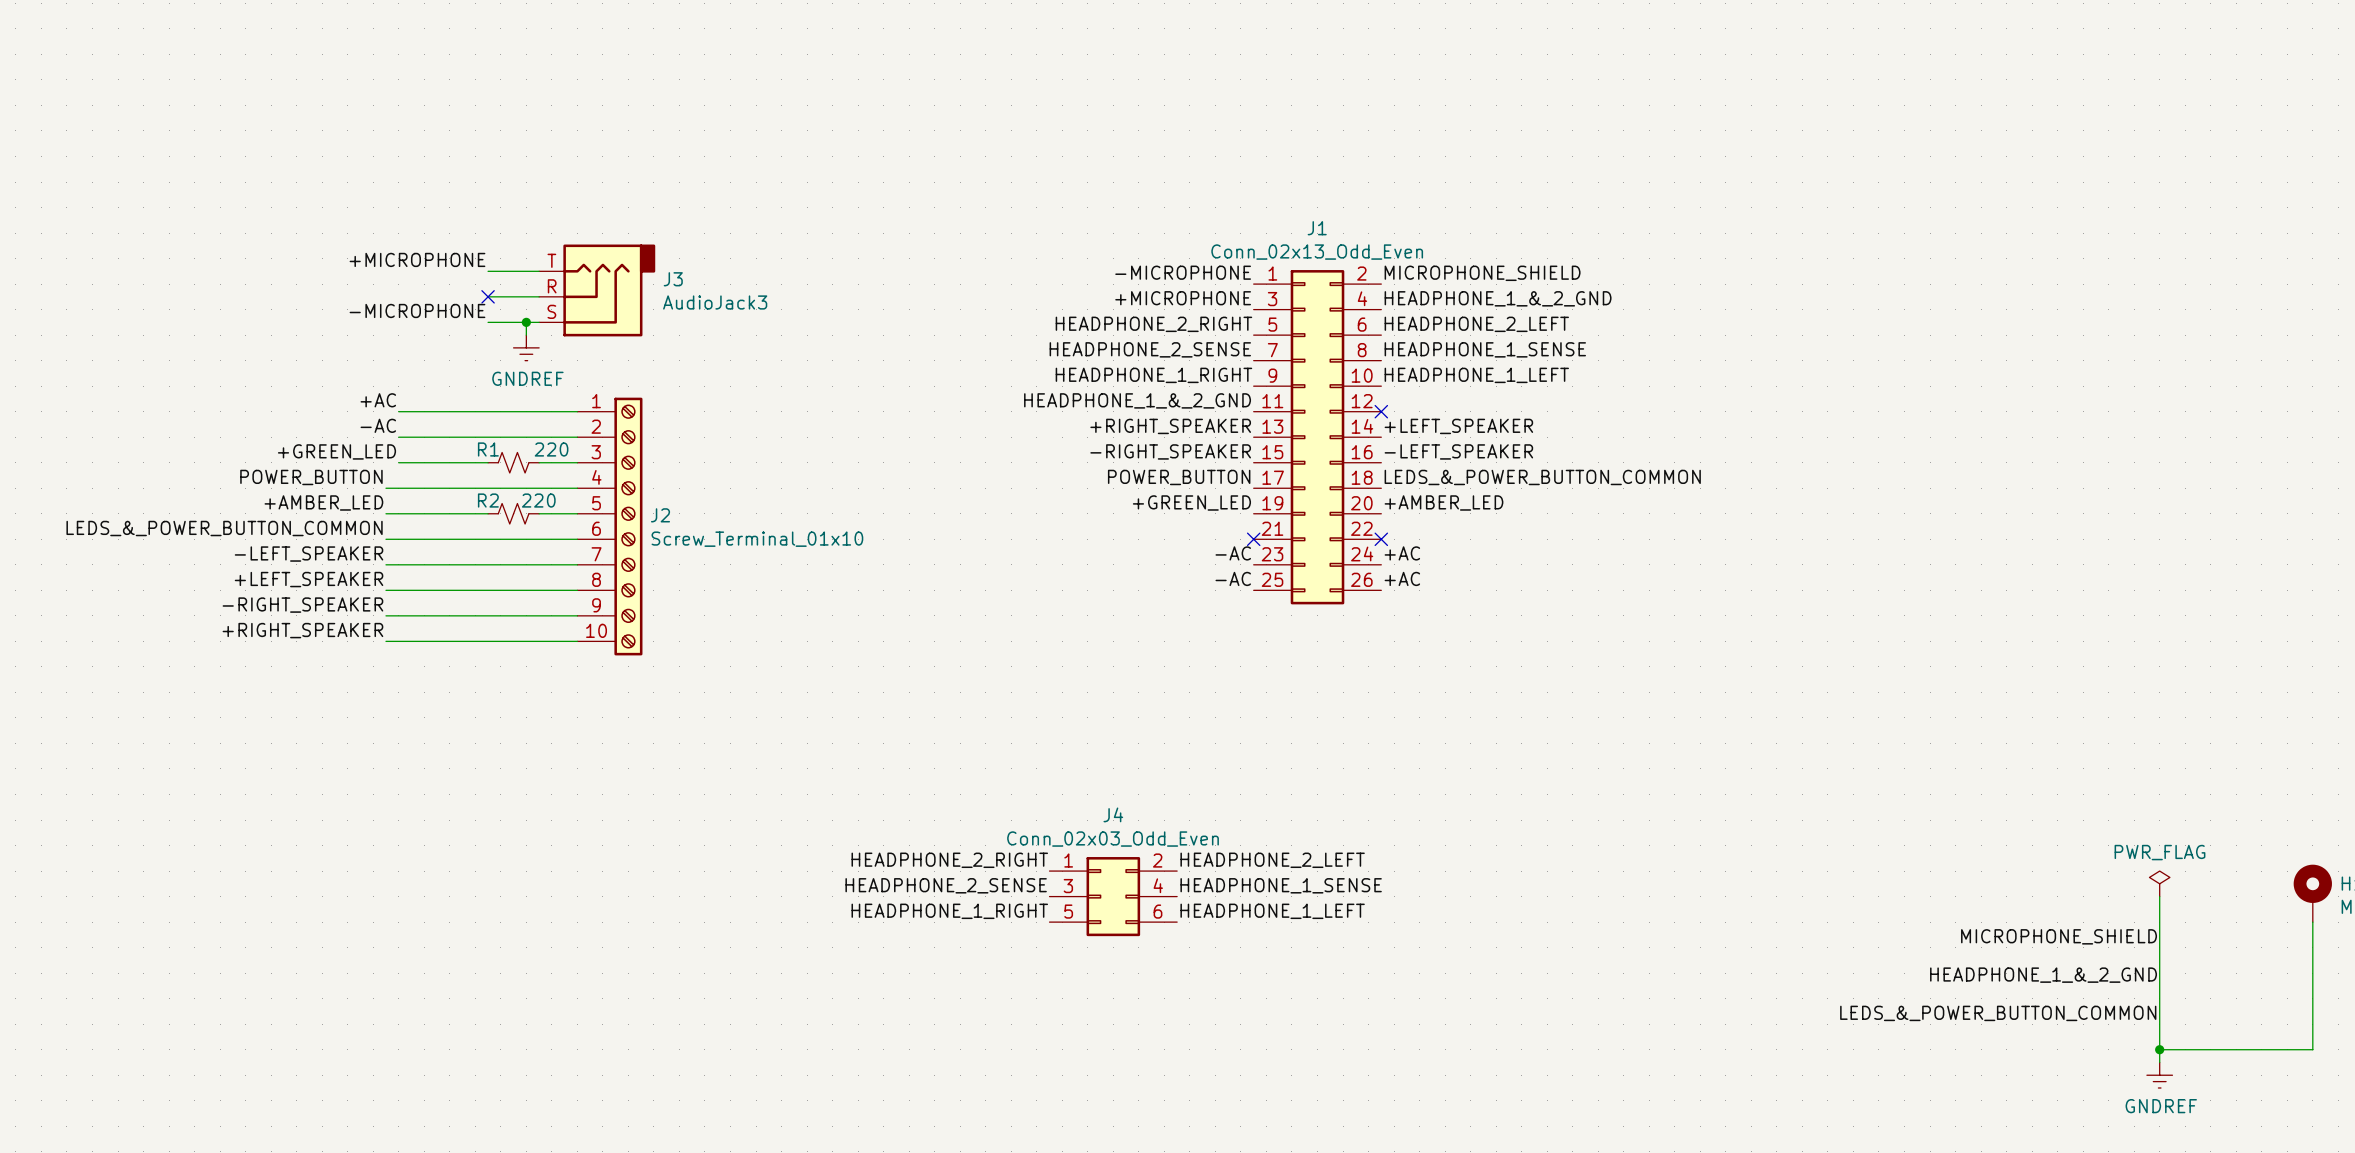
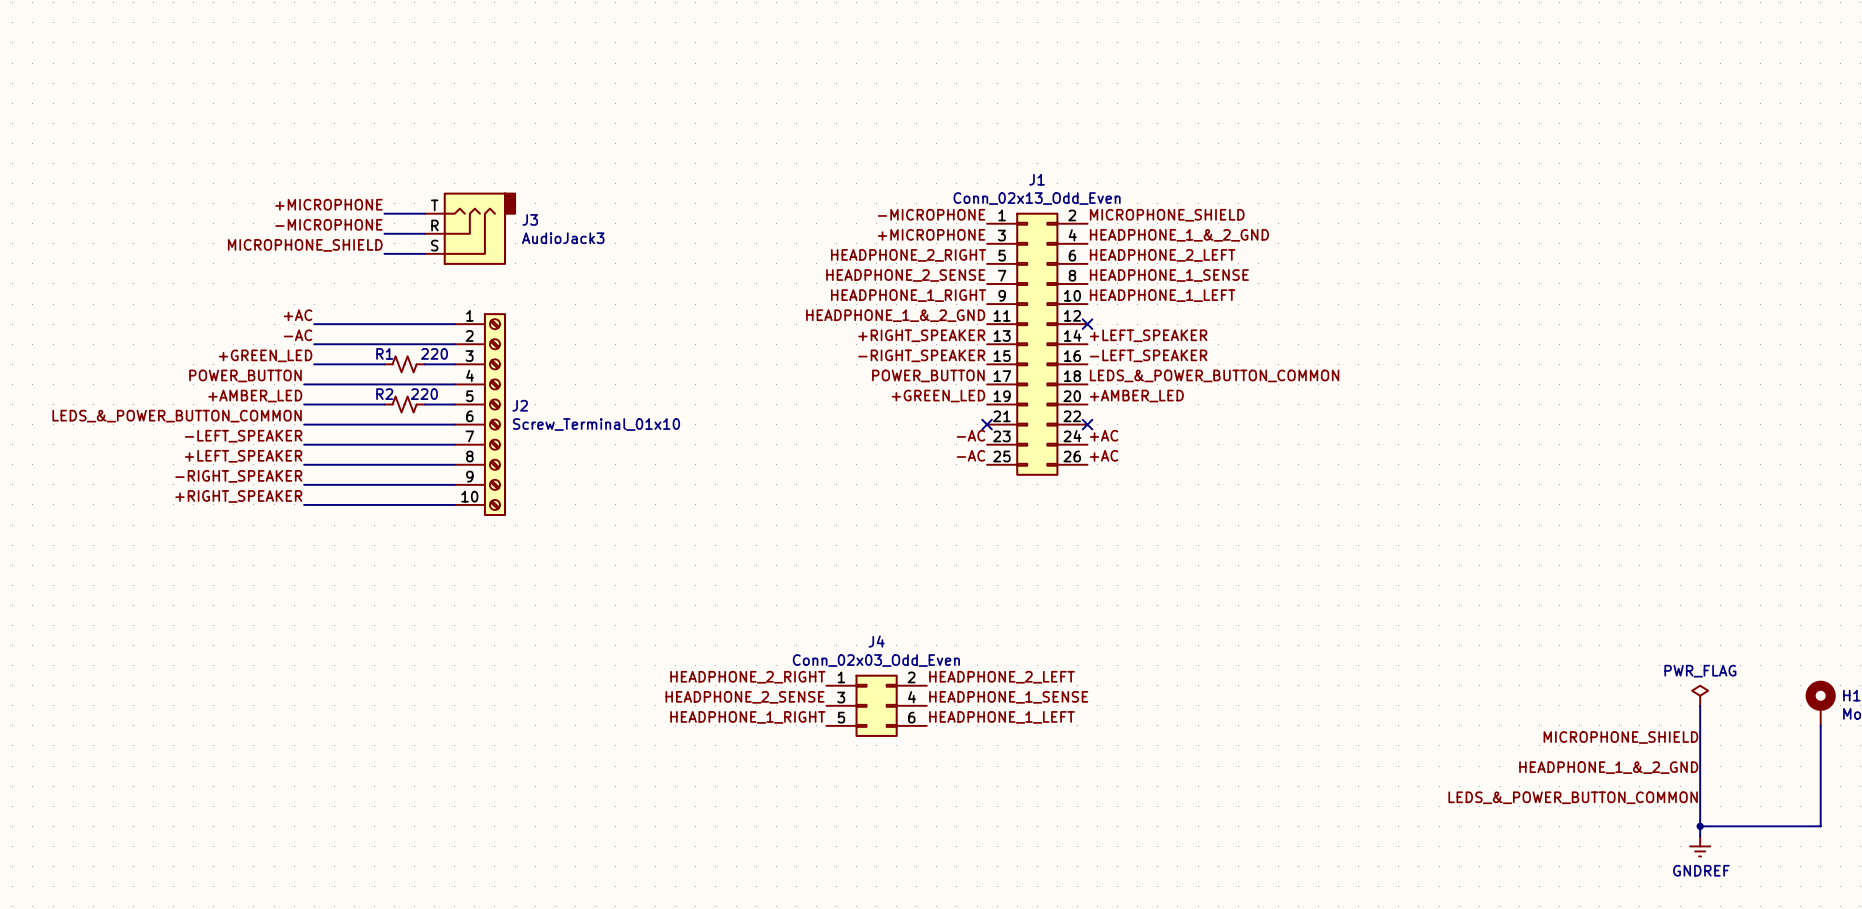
label: none -> -MICROPHONE (328, 224)
no-connect mark: (488, 296) -> none
label: -MICROPHONE (417, 310) -> MICROPHONE_SHIELD (305, 245)
wire: (526, 322) (526, 335) -> none
junction: (526, 322) -> none
power symbol: GNDREF (526, 347) -> none

